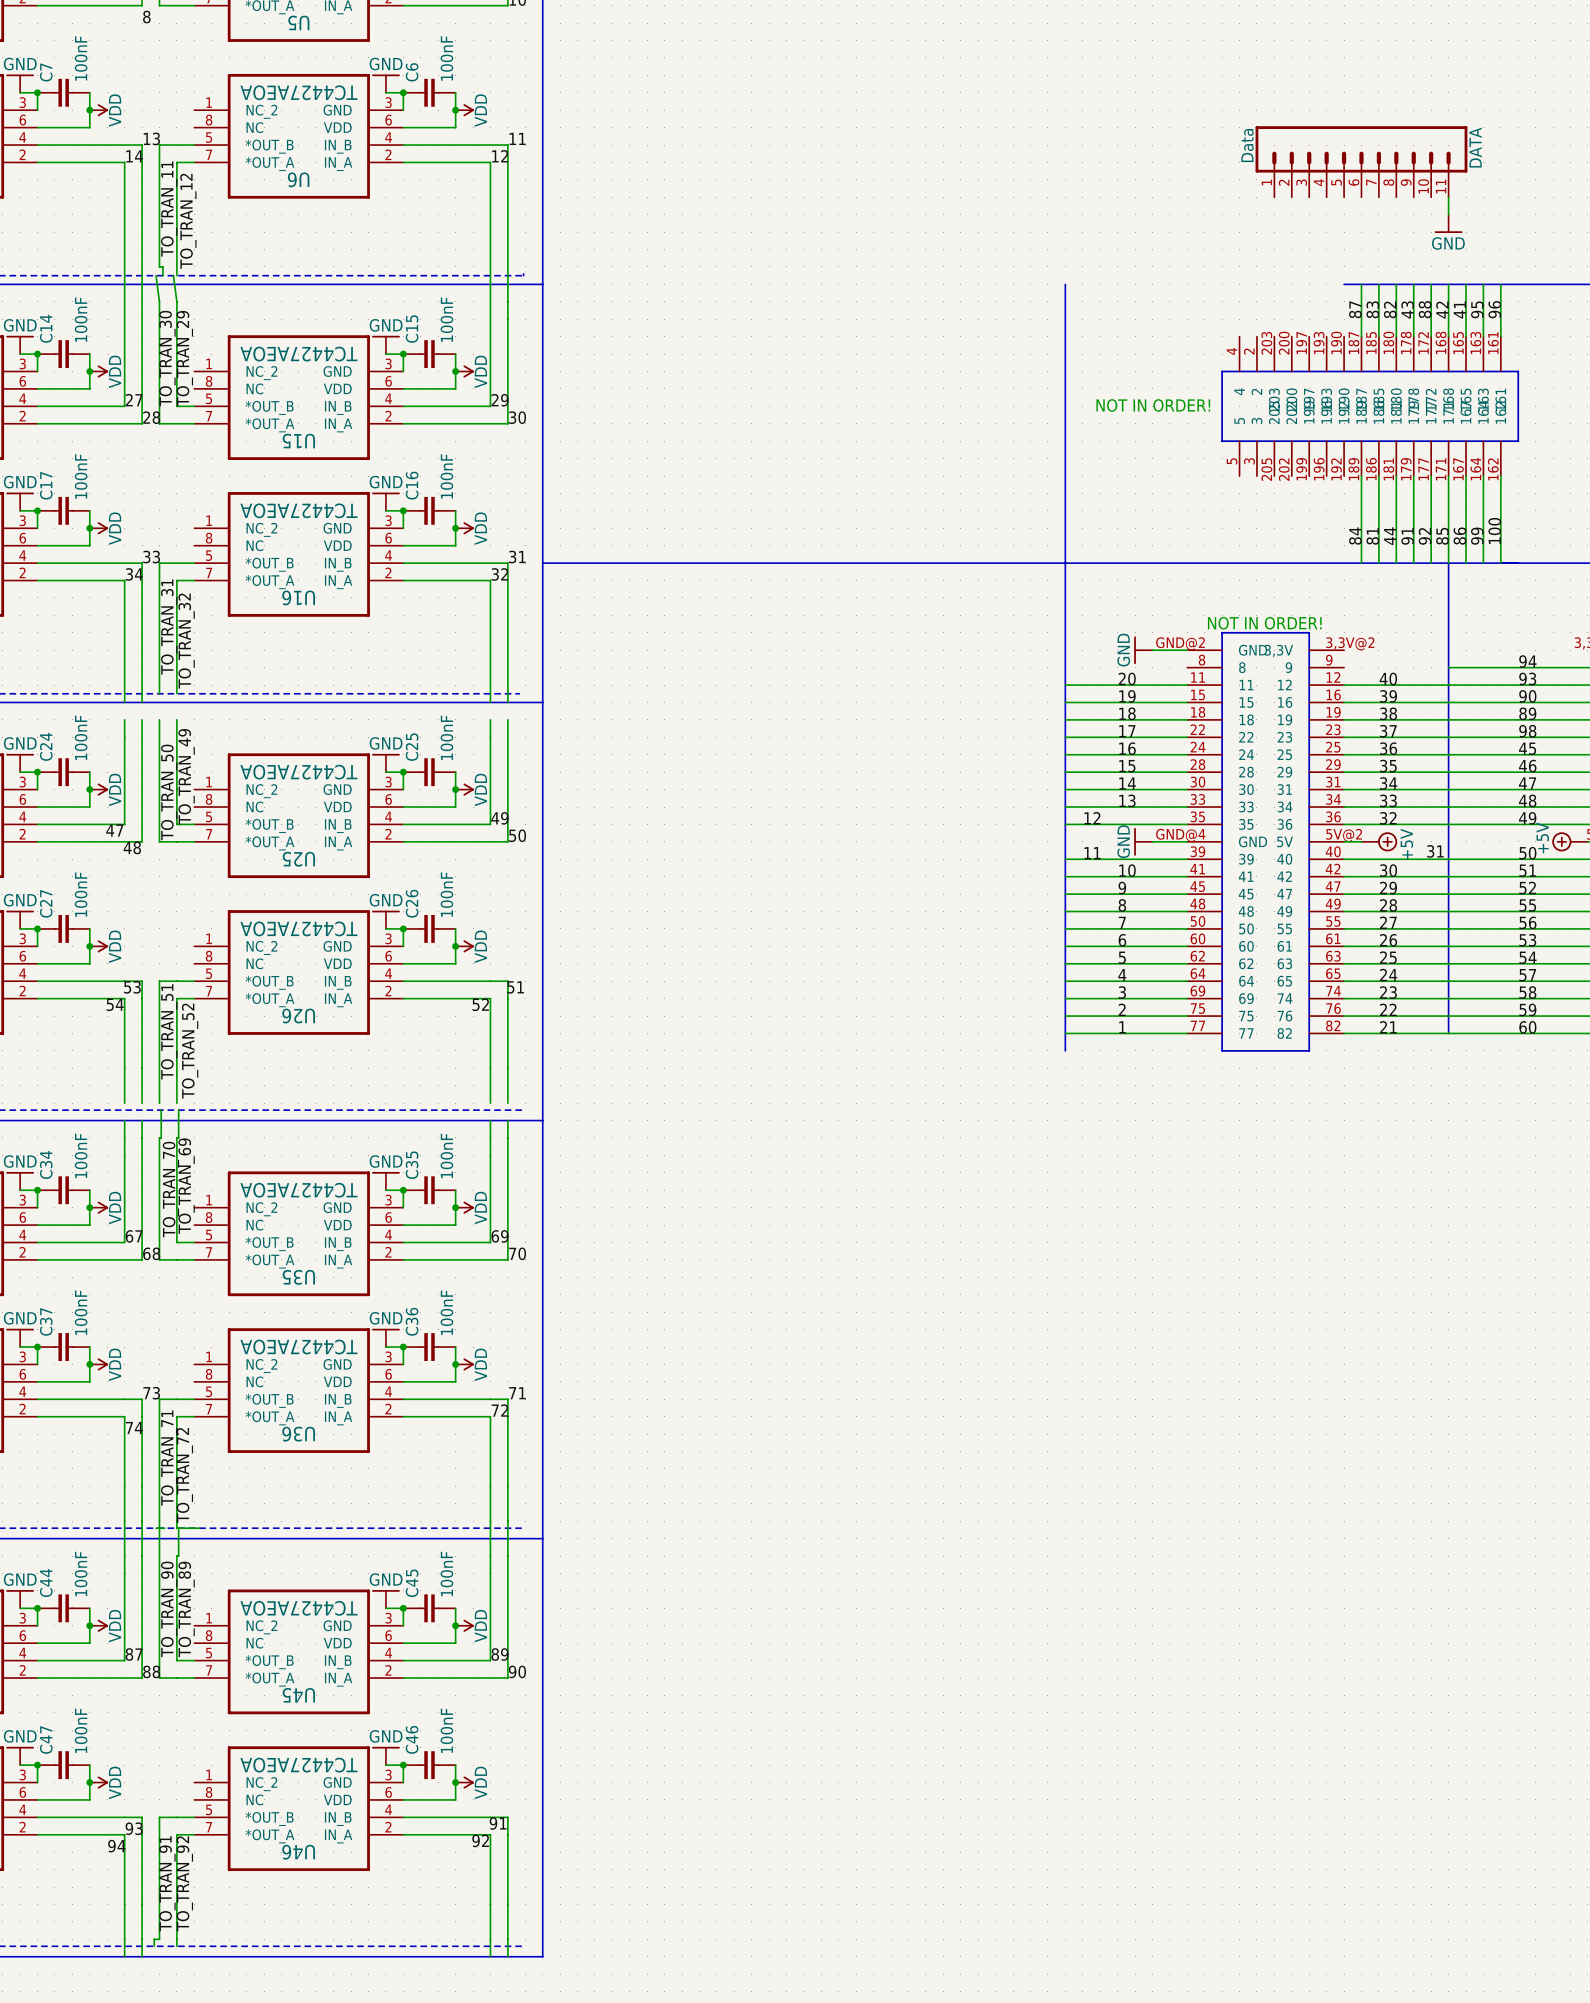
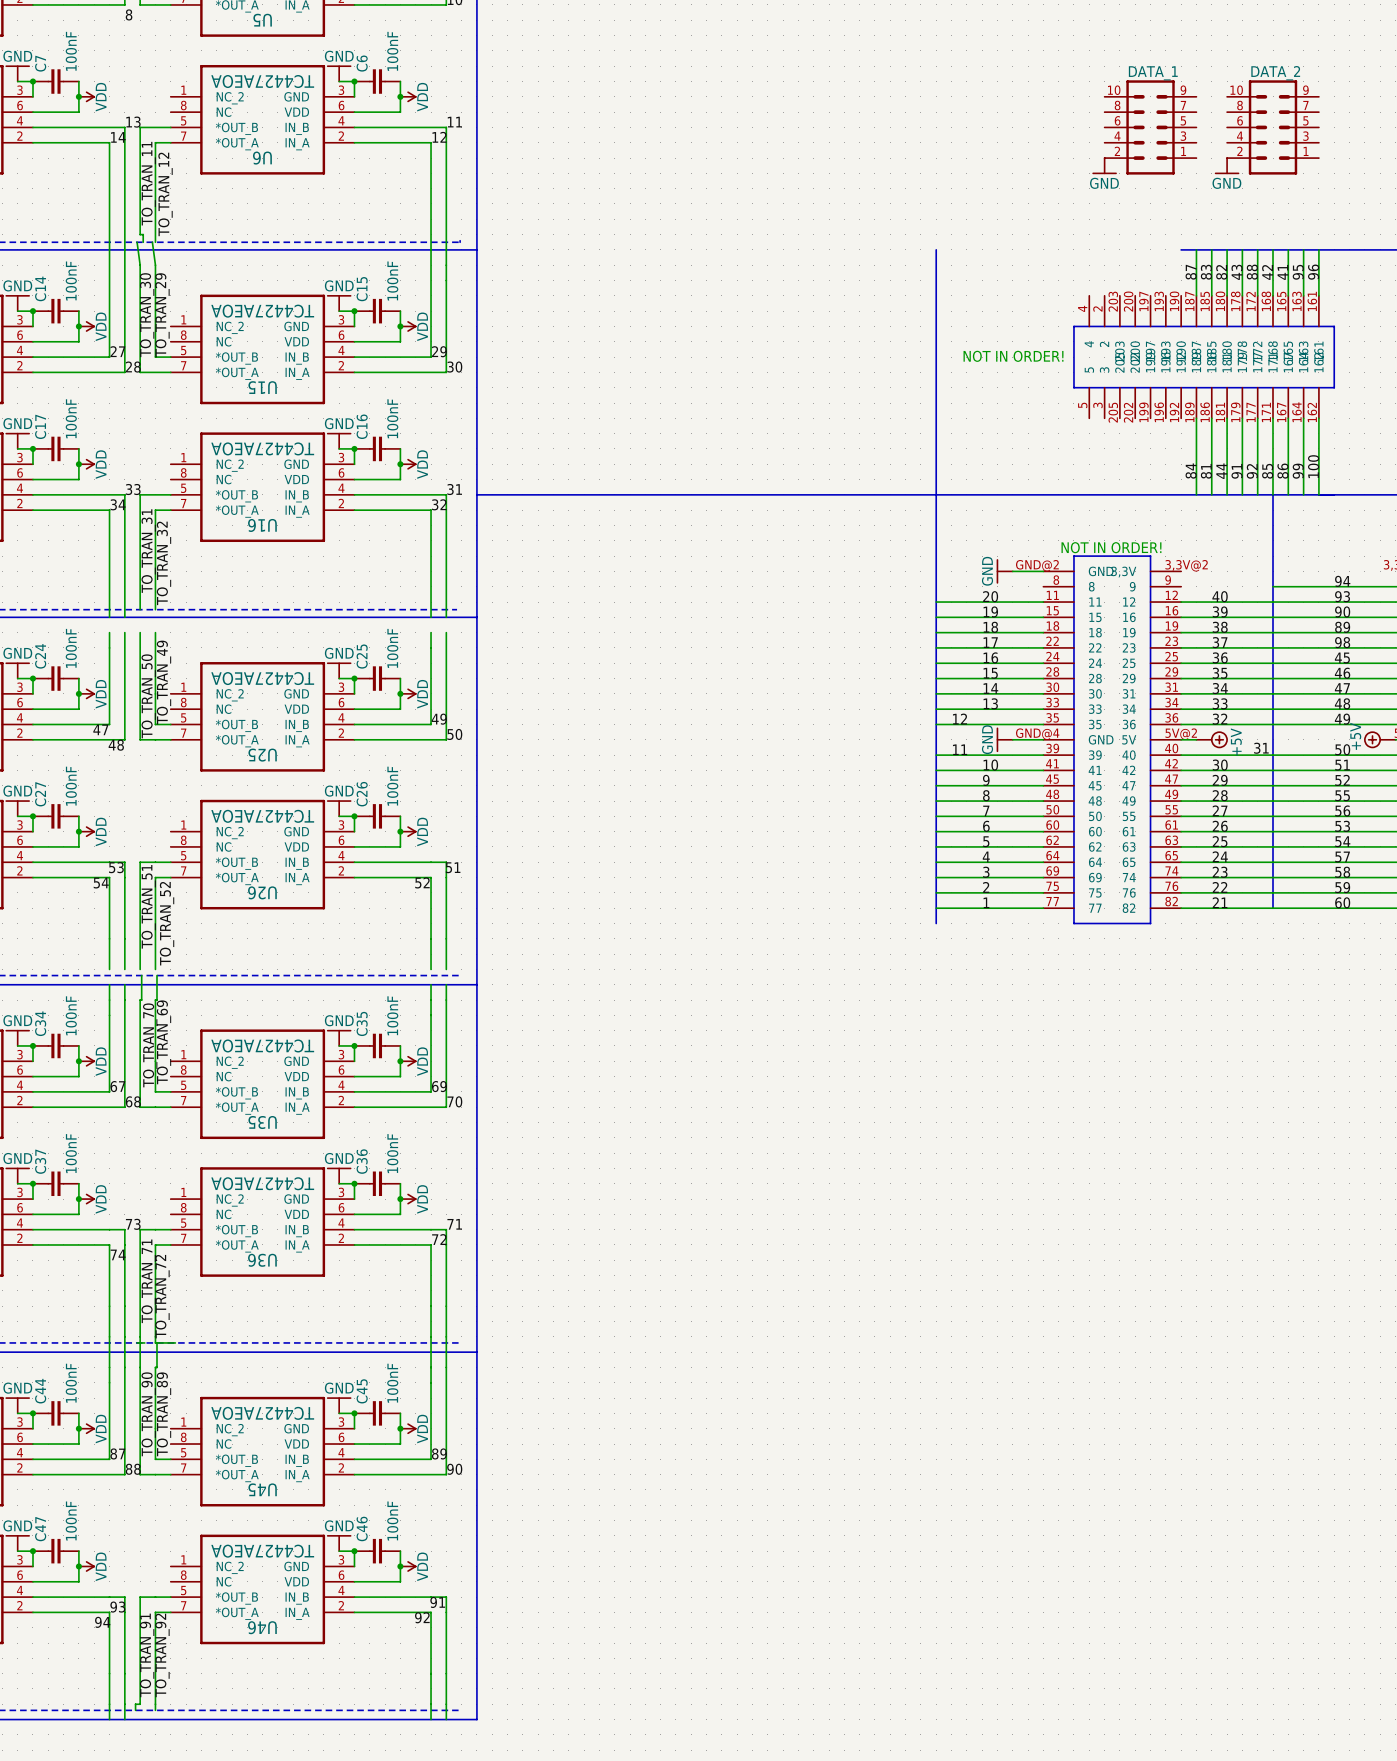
DATA_1: none -> (1150, 127)
DATA_2: none -> (1273, 127)
DATA: Data (1361, 161) -> none
power symbol: none -> GND (1104, 166)
wire: (1448, 197) (1448, 214) -> none
power symbol position: GND (1448, 223) -> GND (1227, 166)

